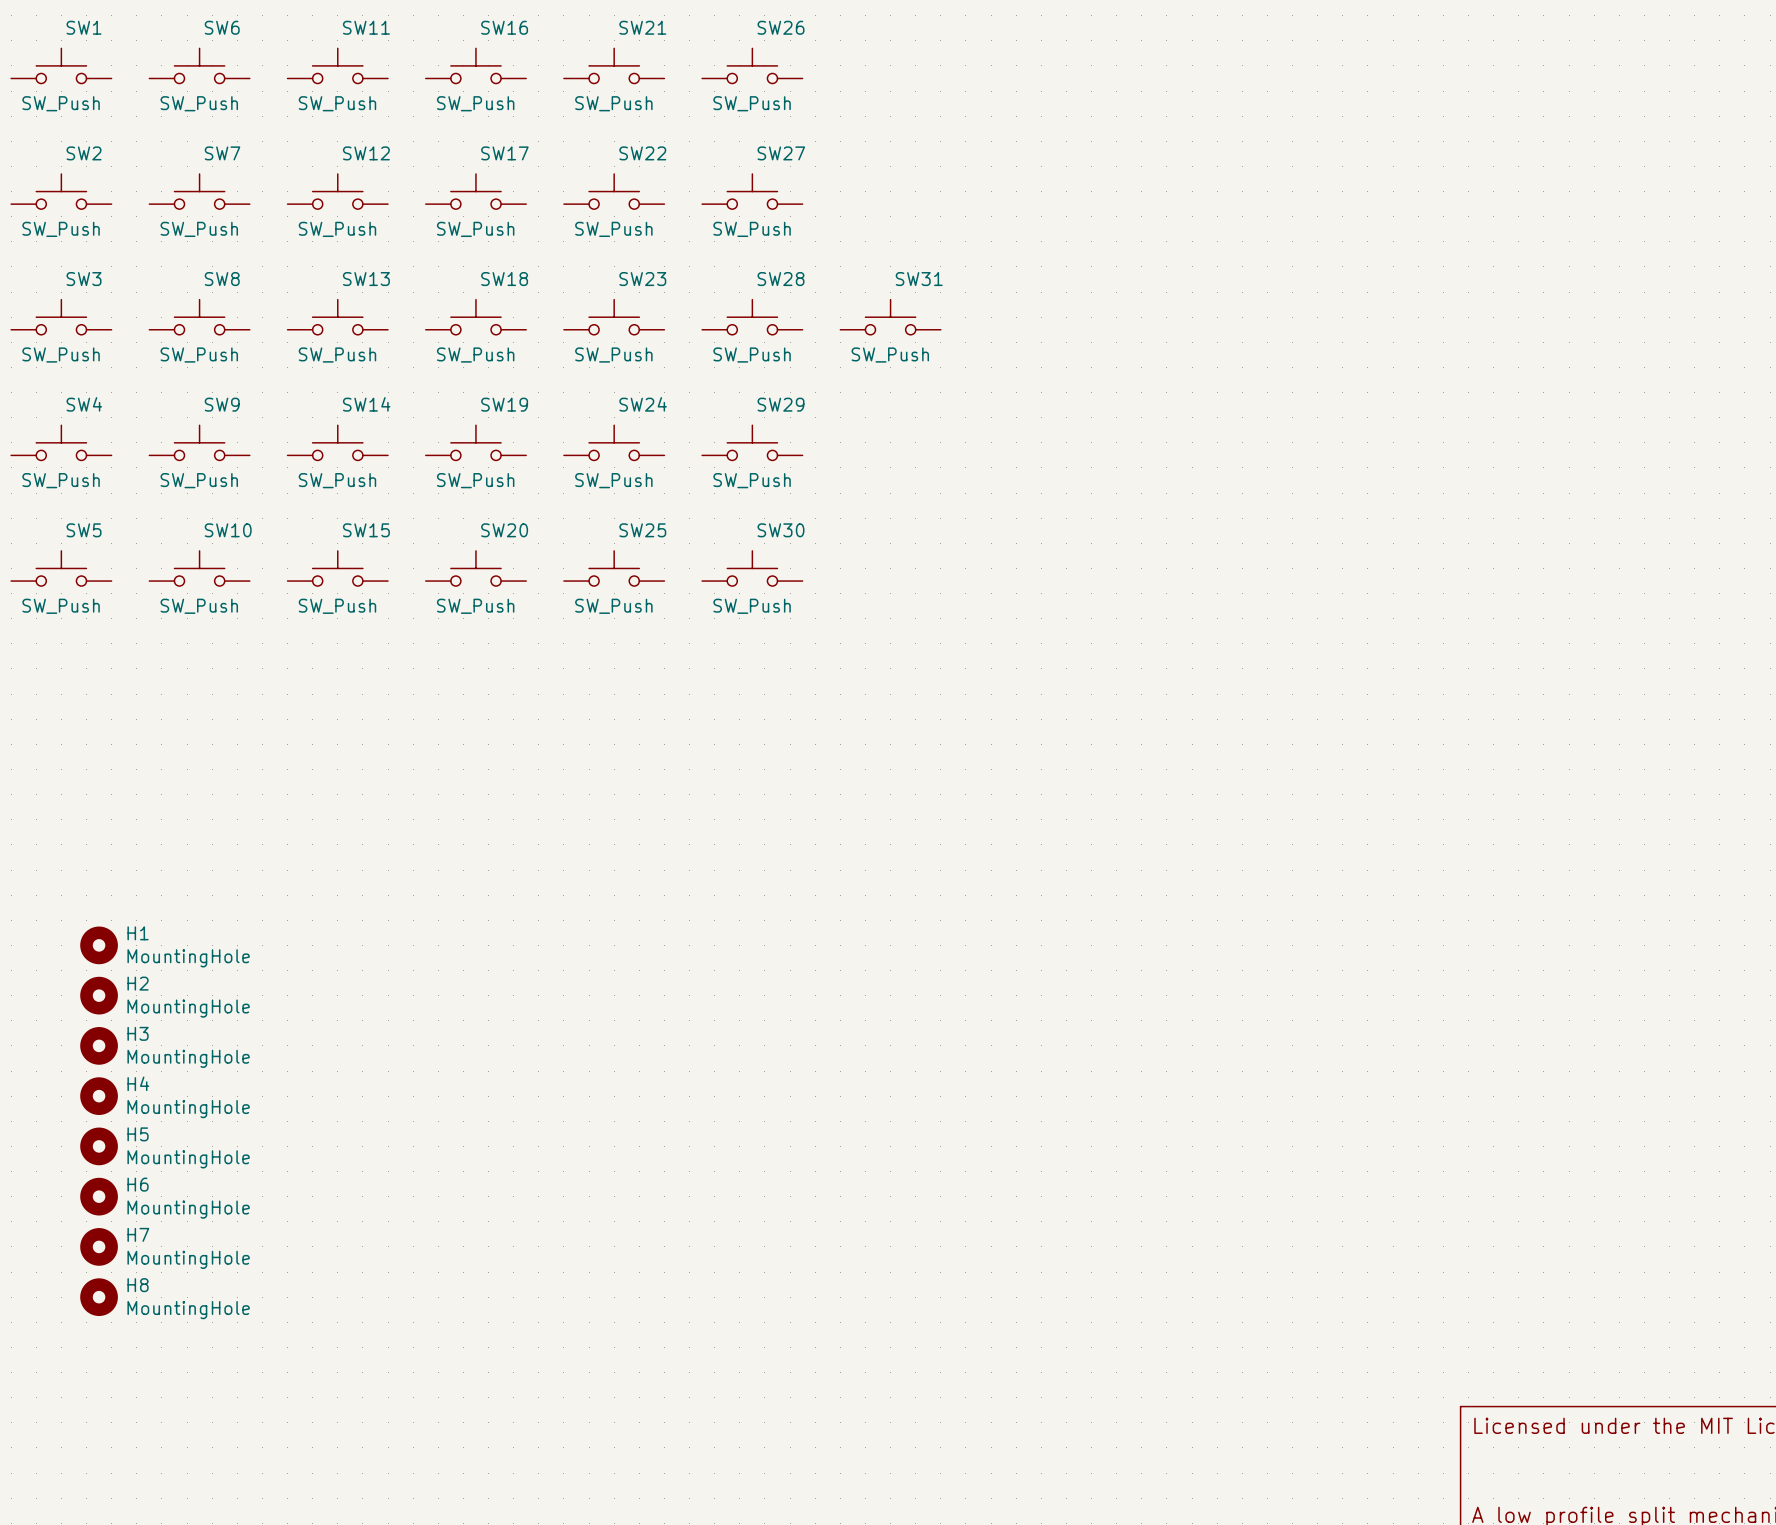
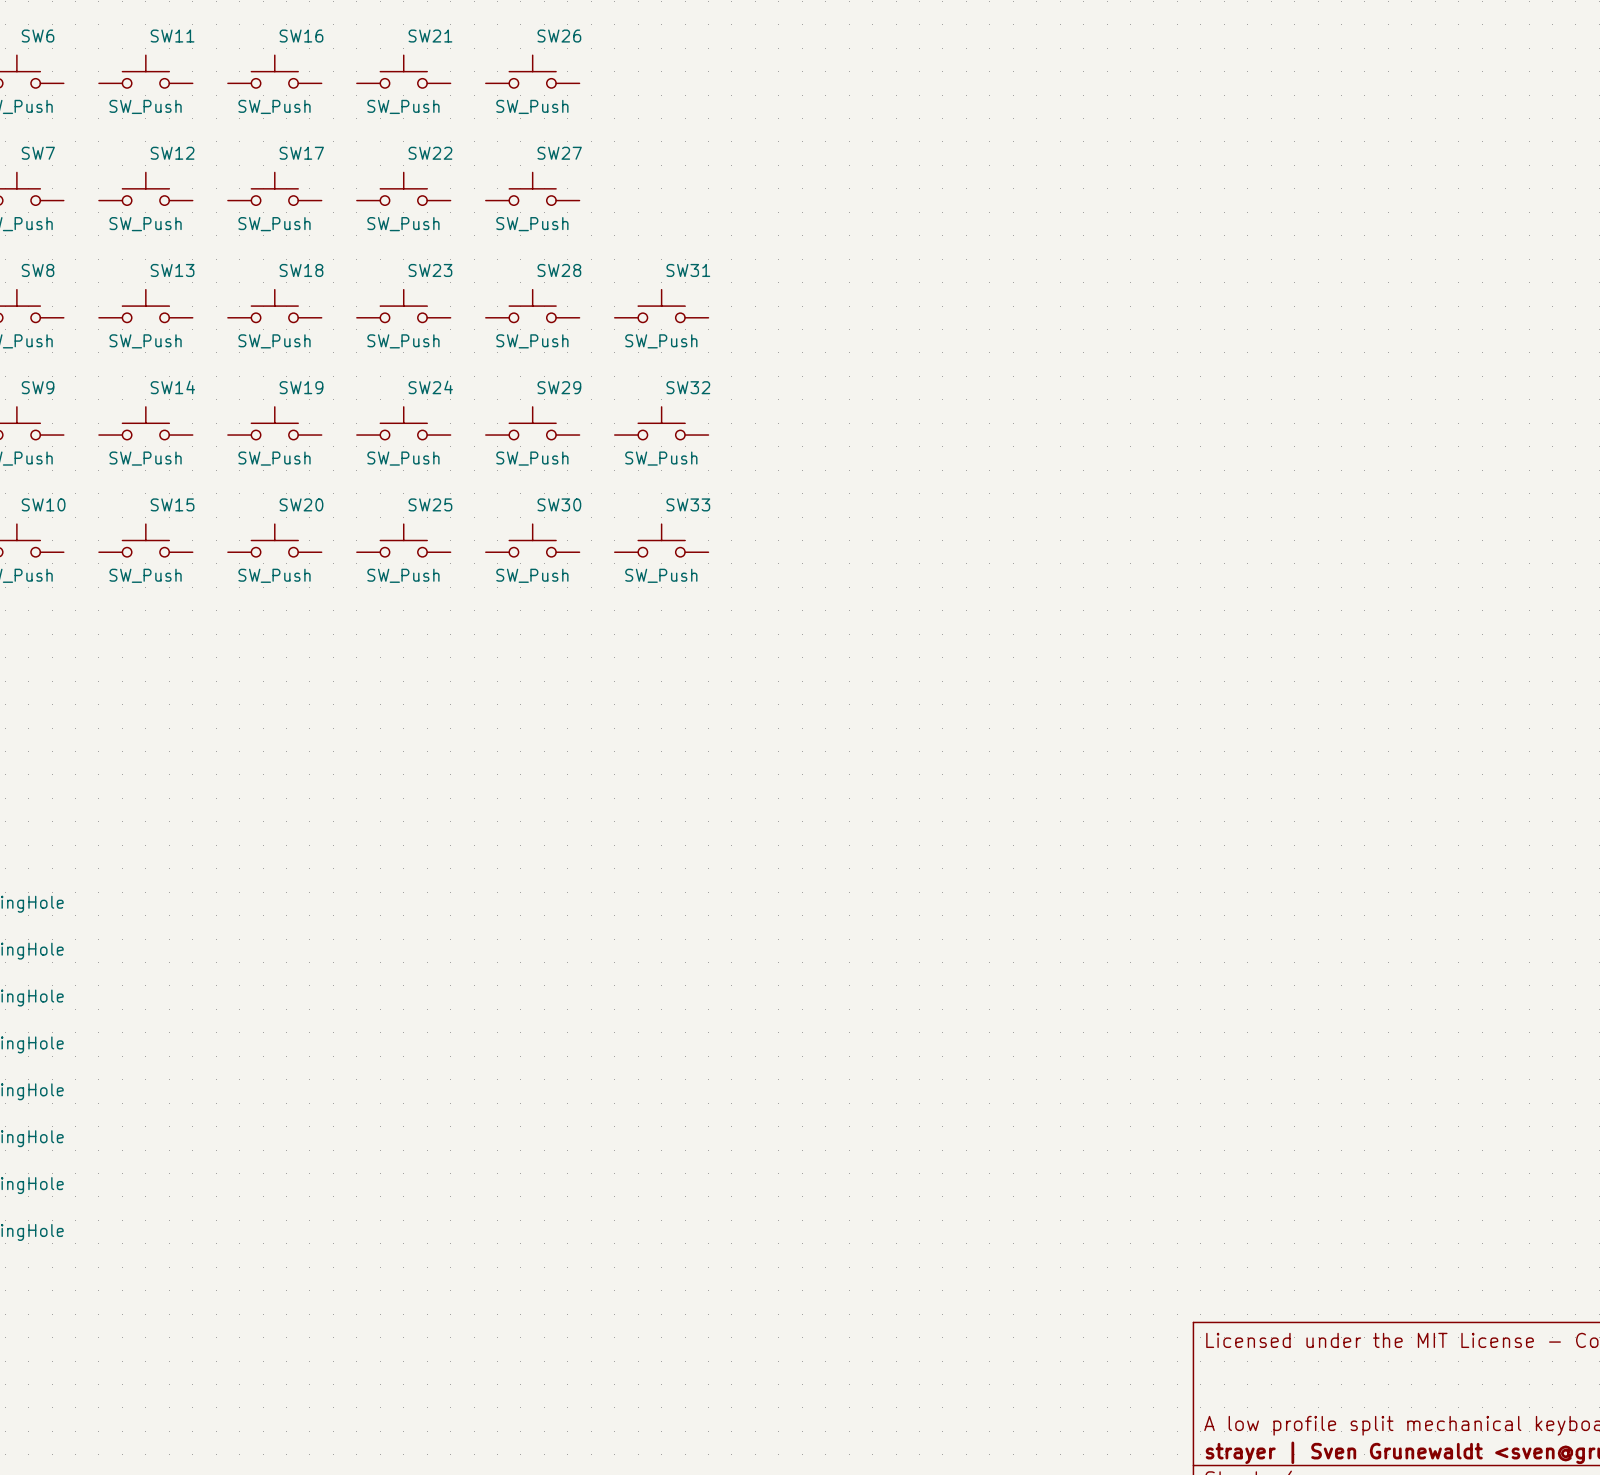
SW32: none -> SW_Push (661, 423)
SW33: none -> SW_Push (661, 540)

